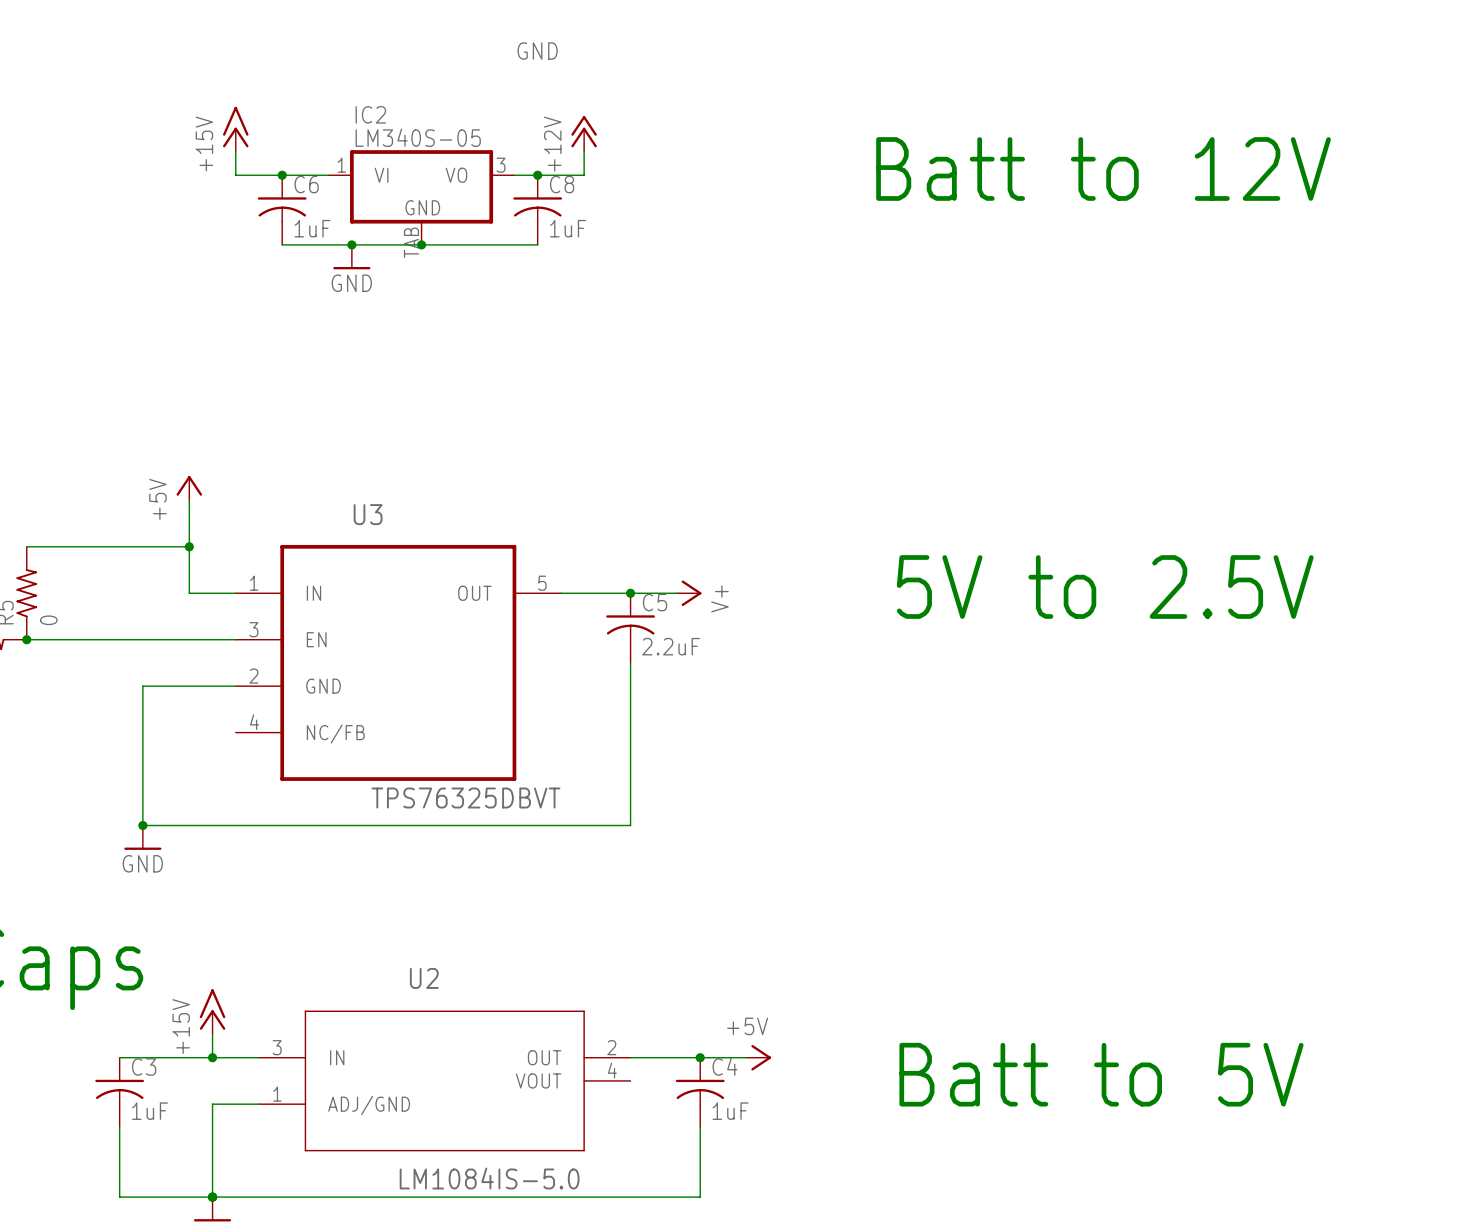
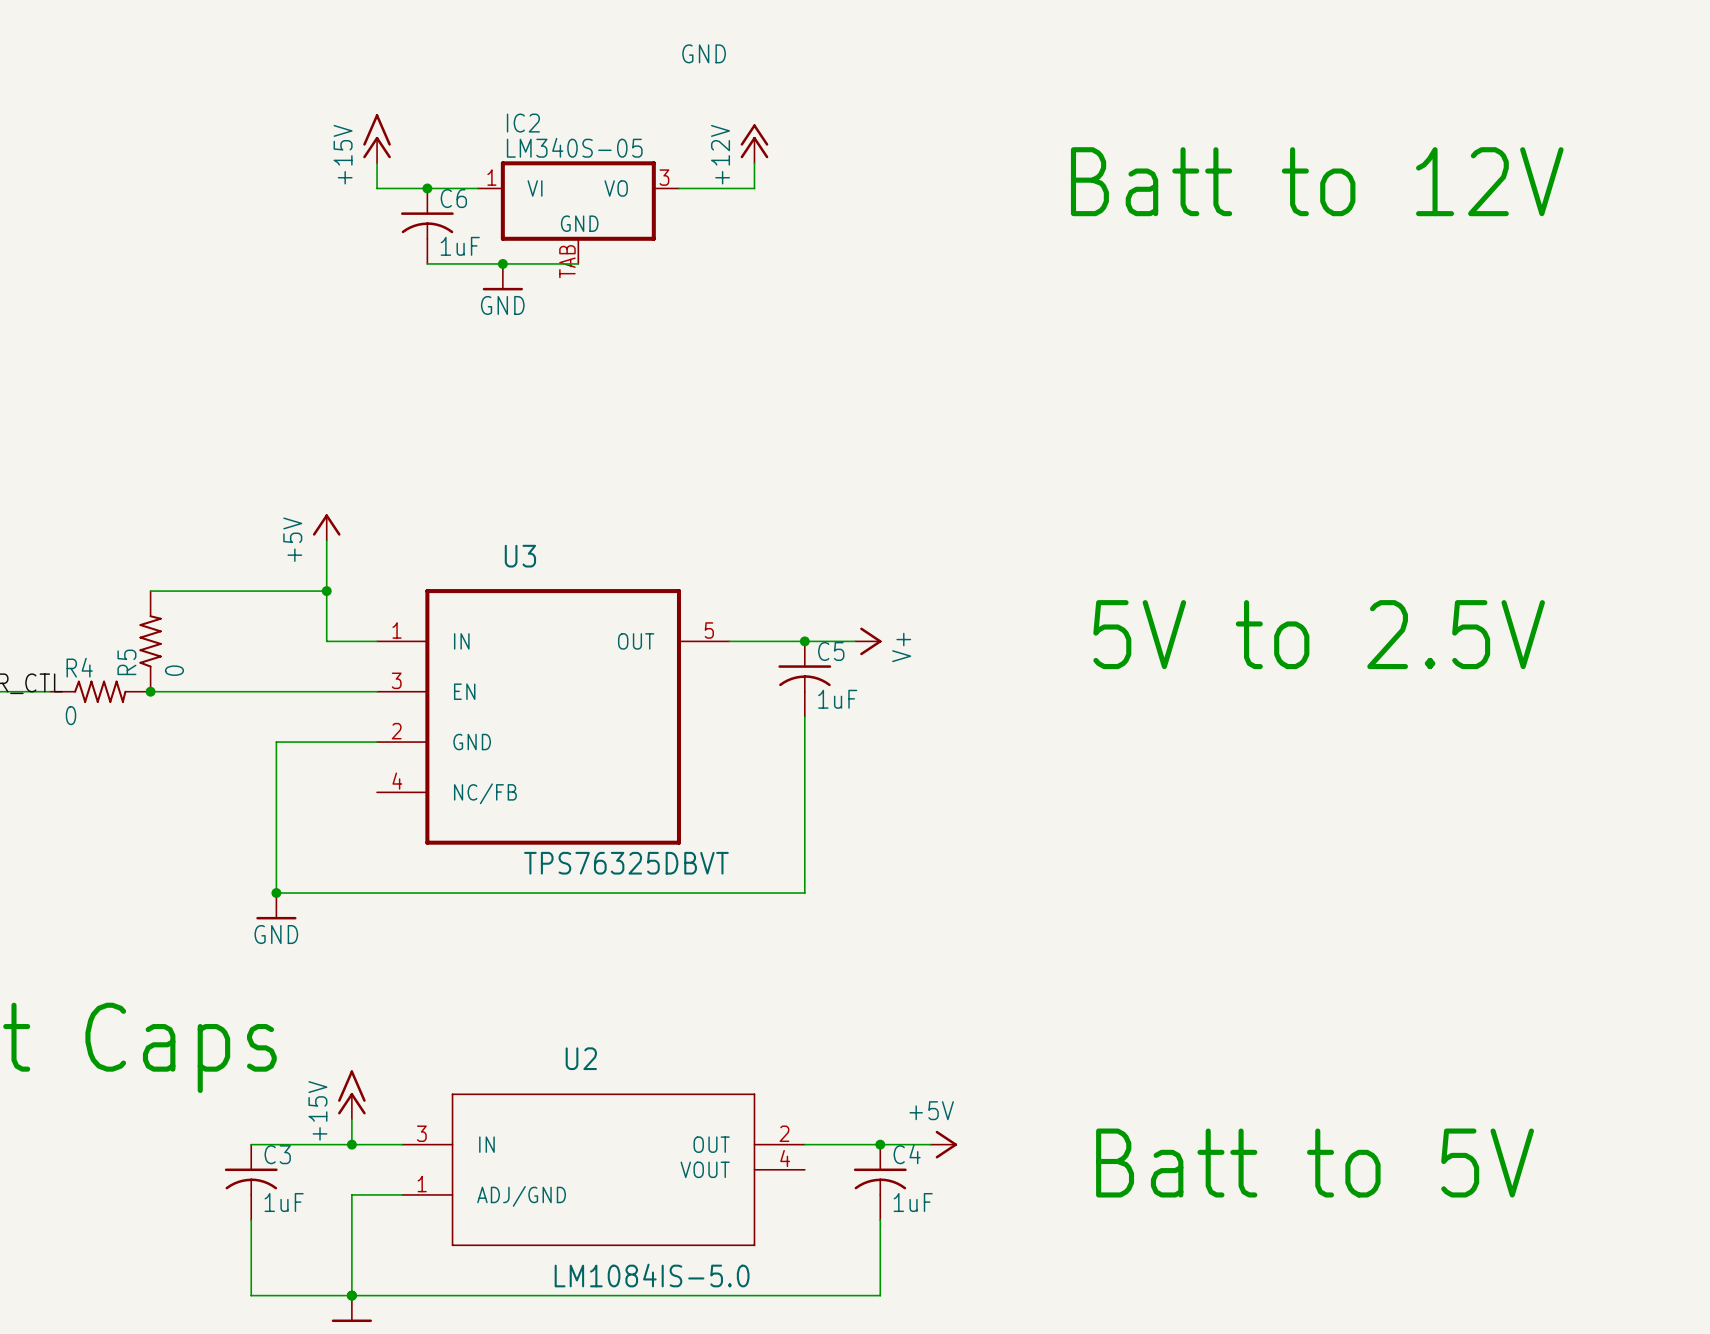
junction: (537, 175) -> none
C8: 1uF (537, 210) -> none
wire: (421, 244) (537, 244) -> none
junction: (421, 244) -> none
C5 value: 2.2uF (671, 646) -> 1uF (837, 699)

